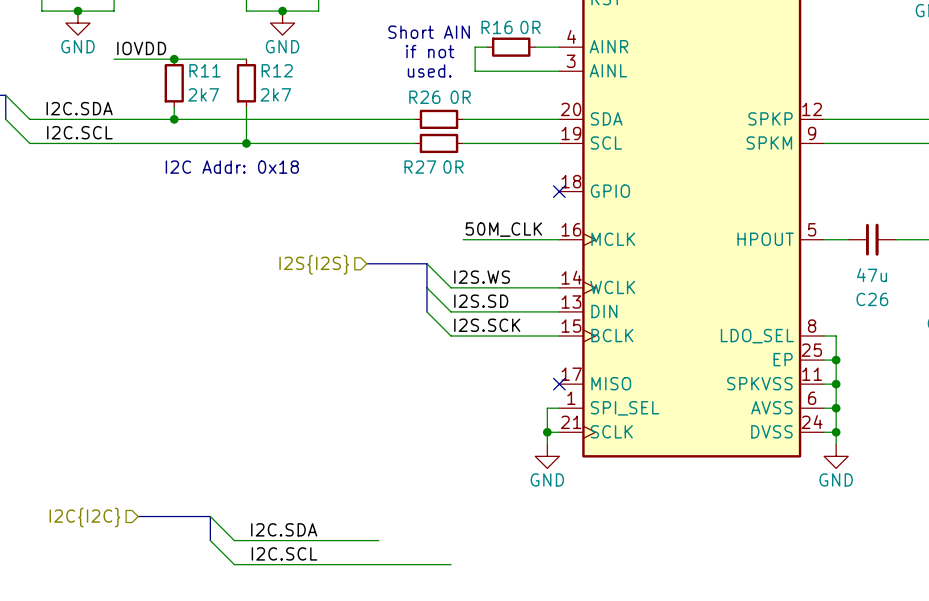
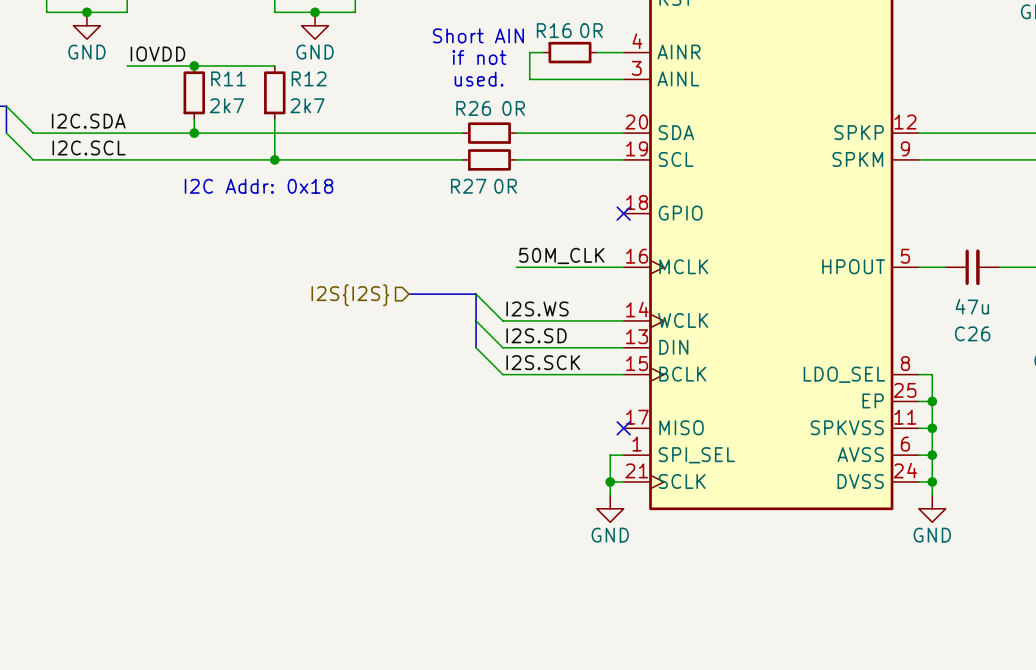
bus: (138, 516) (210, 516) (210, 540) -> none
wire: (210, 516) (234, 540) (378, 540) -> none
hierarchical label: I2C{I2C} (84, 517) -> none
label: I2C.SDA (284, 529) -> none
wire: (210, 540) (234, 564) (451, 564) -> none
label: I2C.SCL (284, 553) -> none

